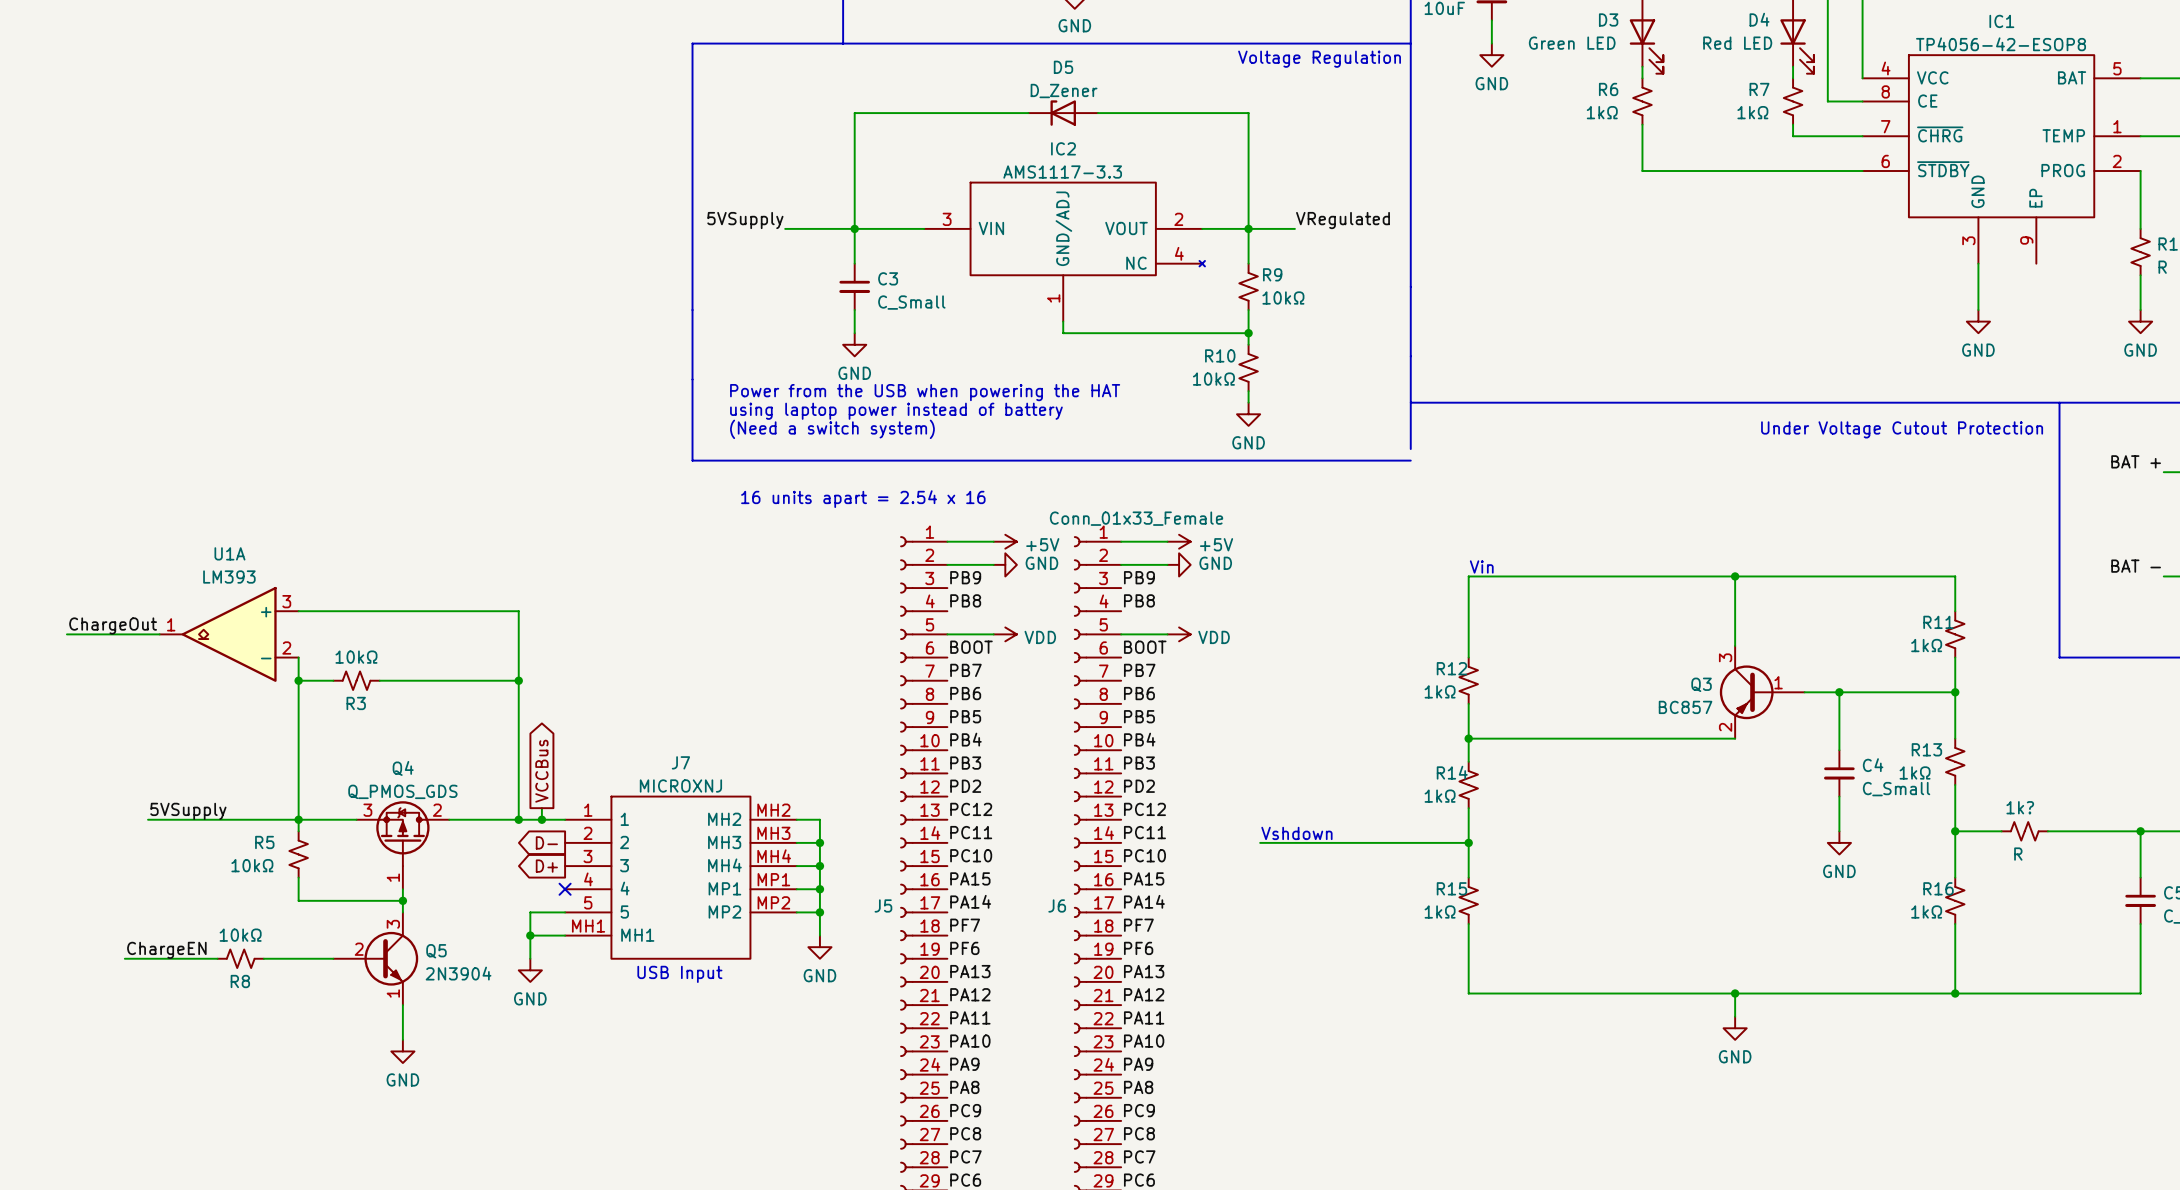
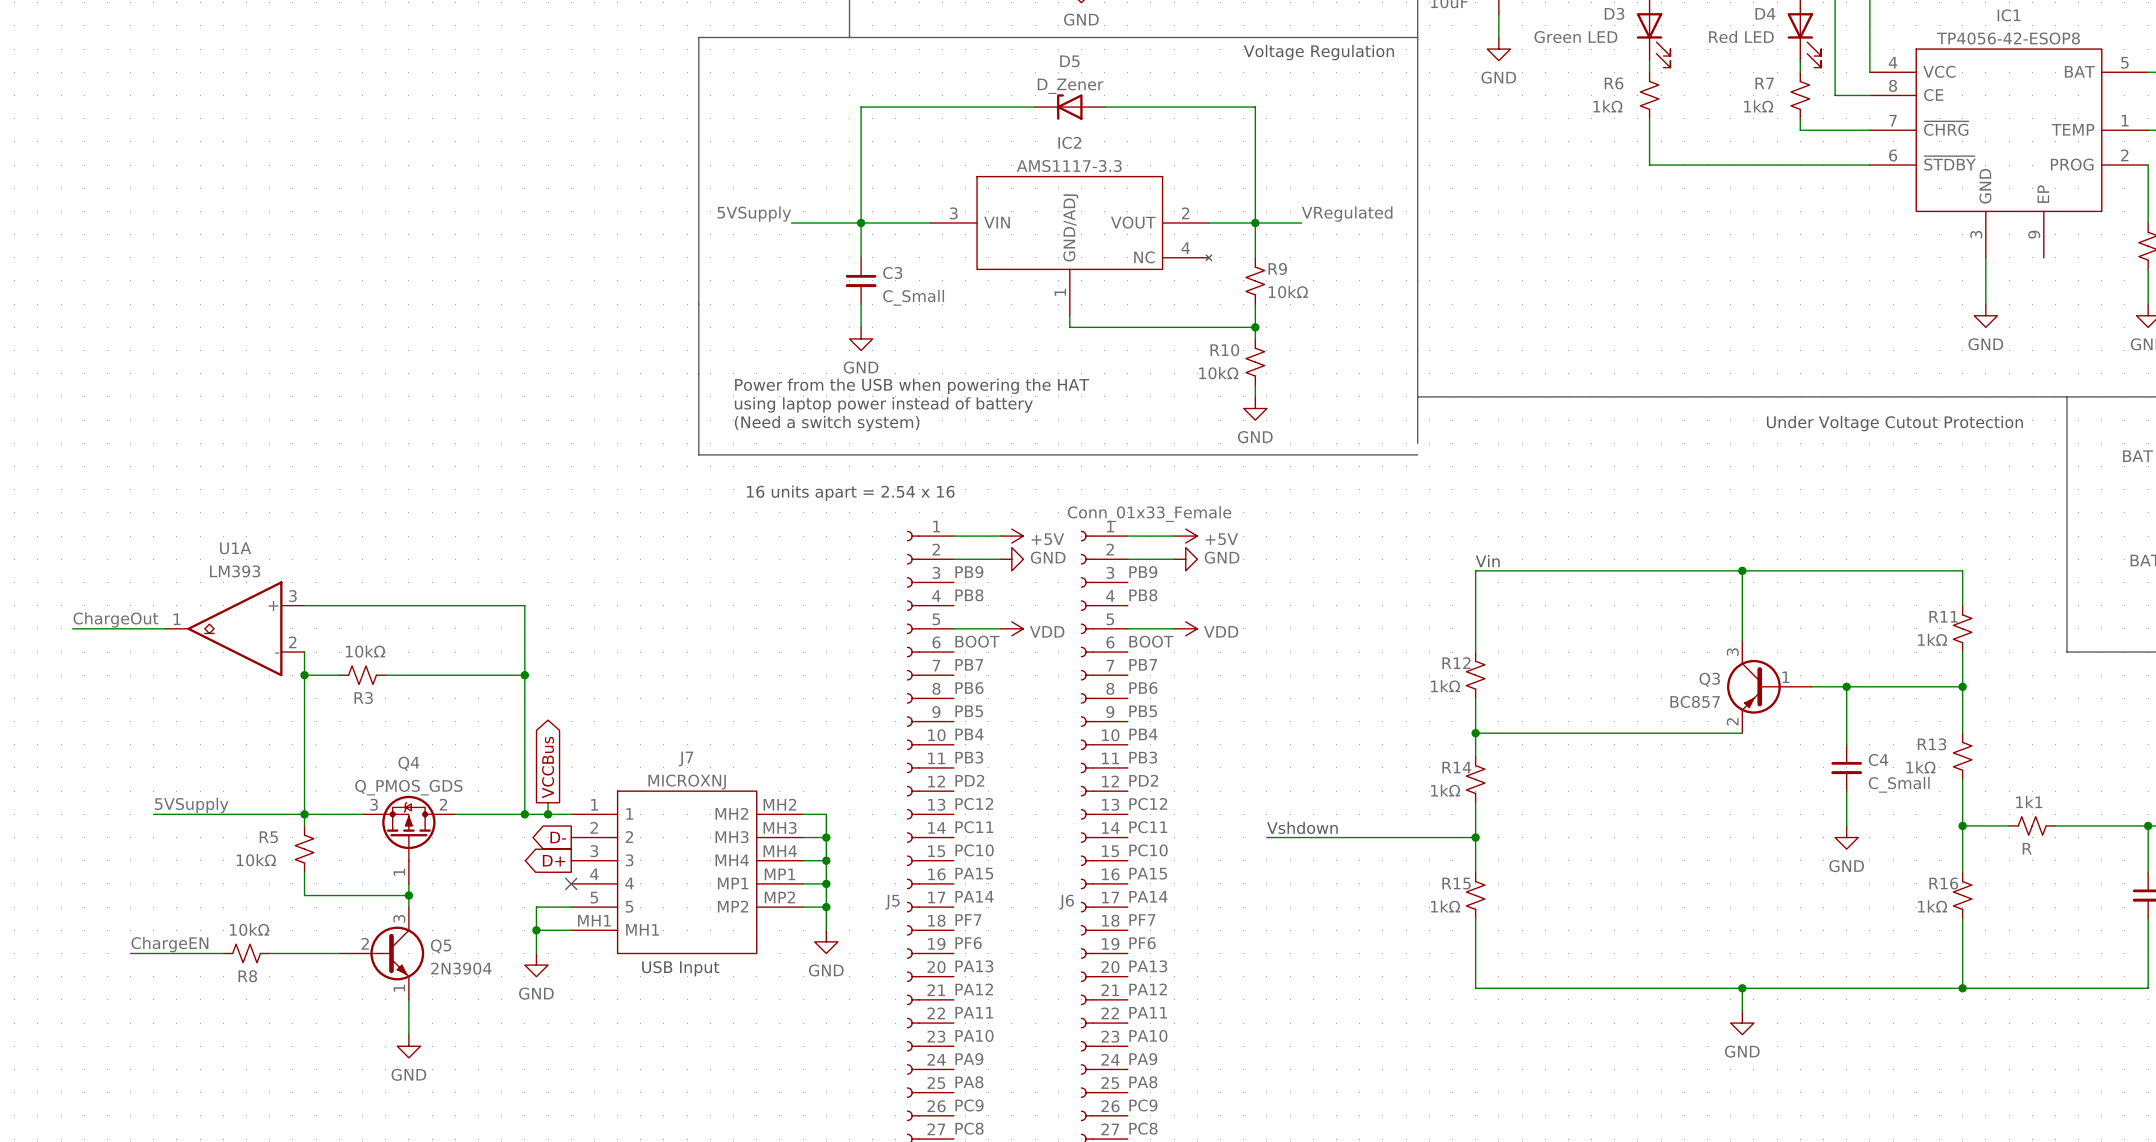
1k? name: 1k? (2020, 807) -> 1k1 (2029, 802)

